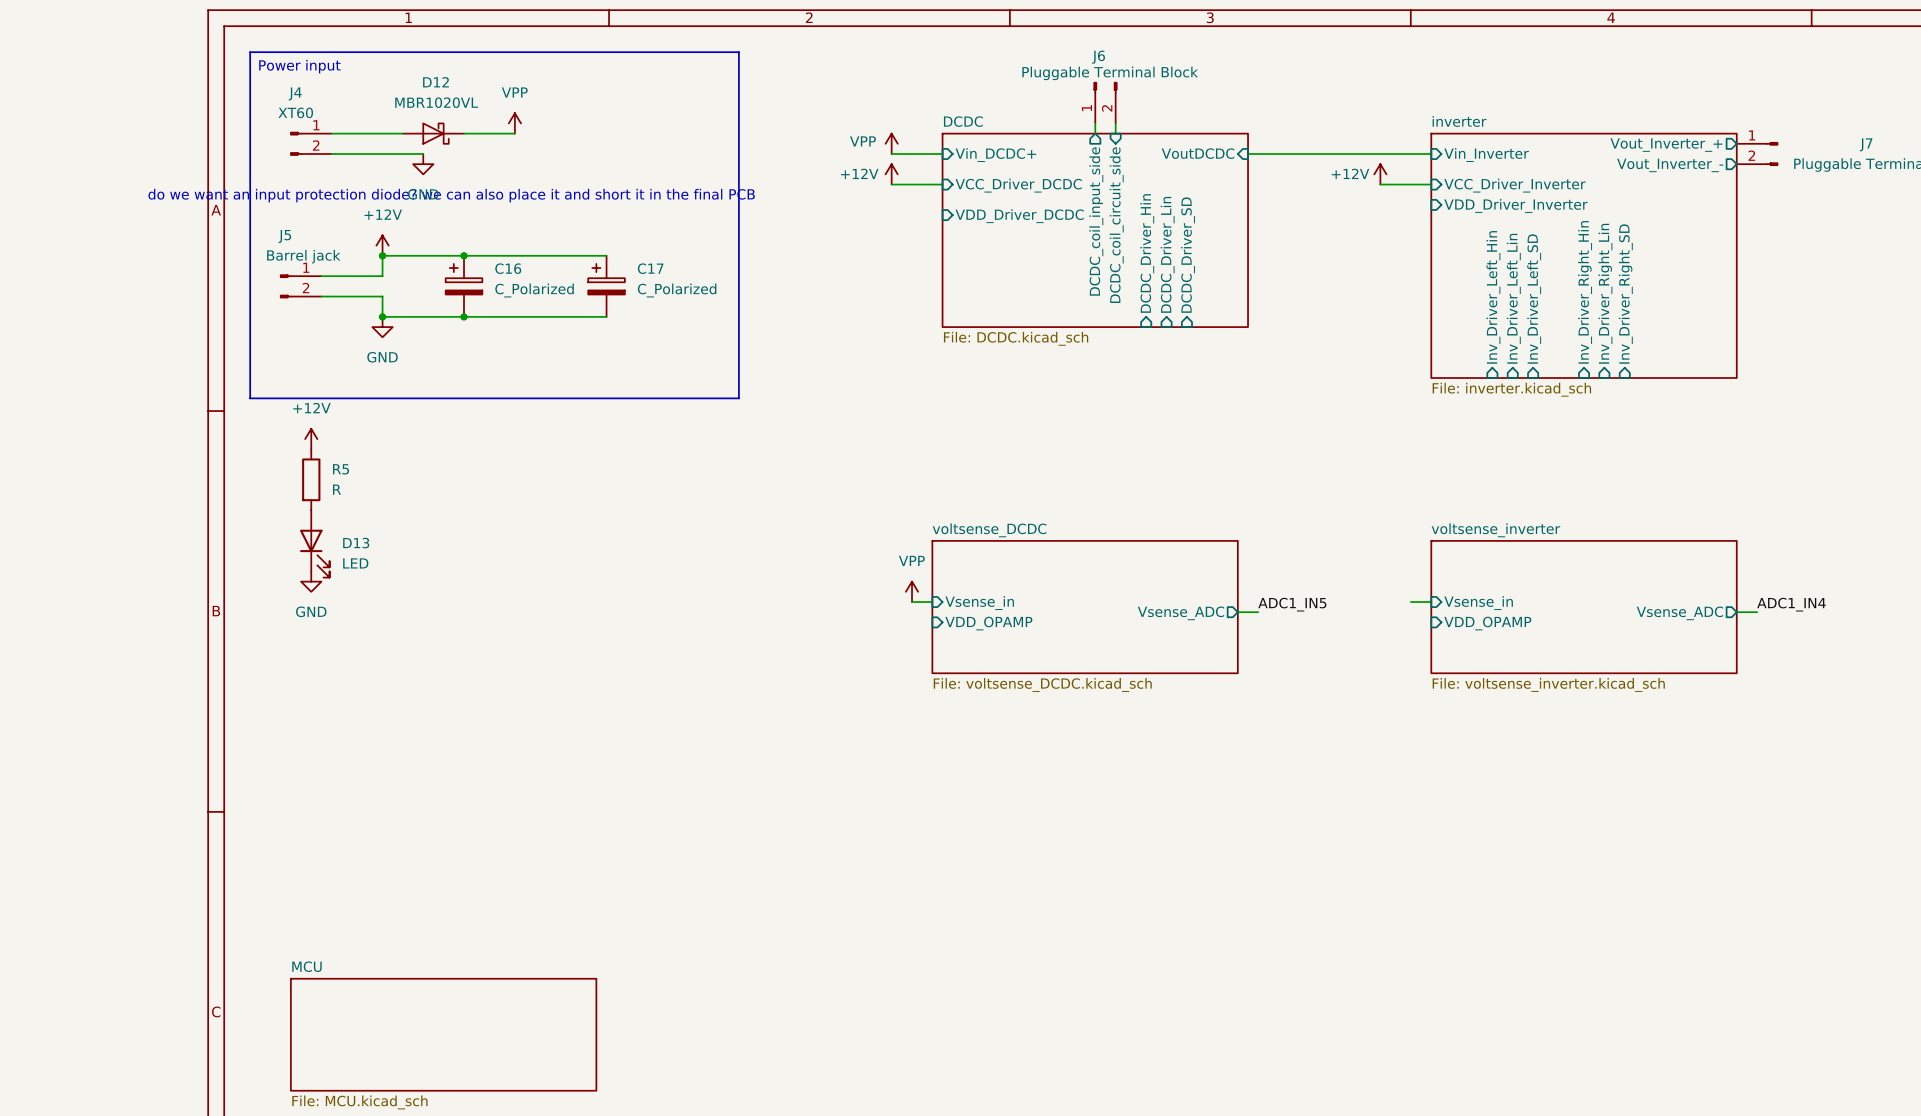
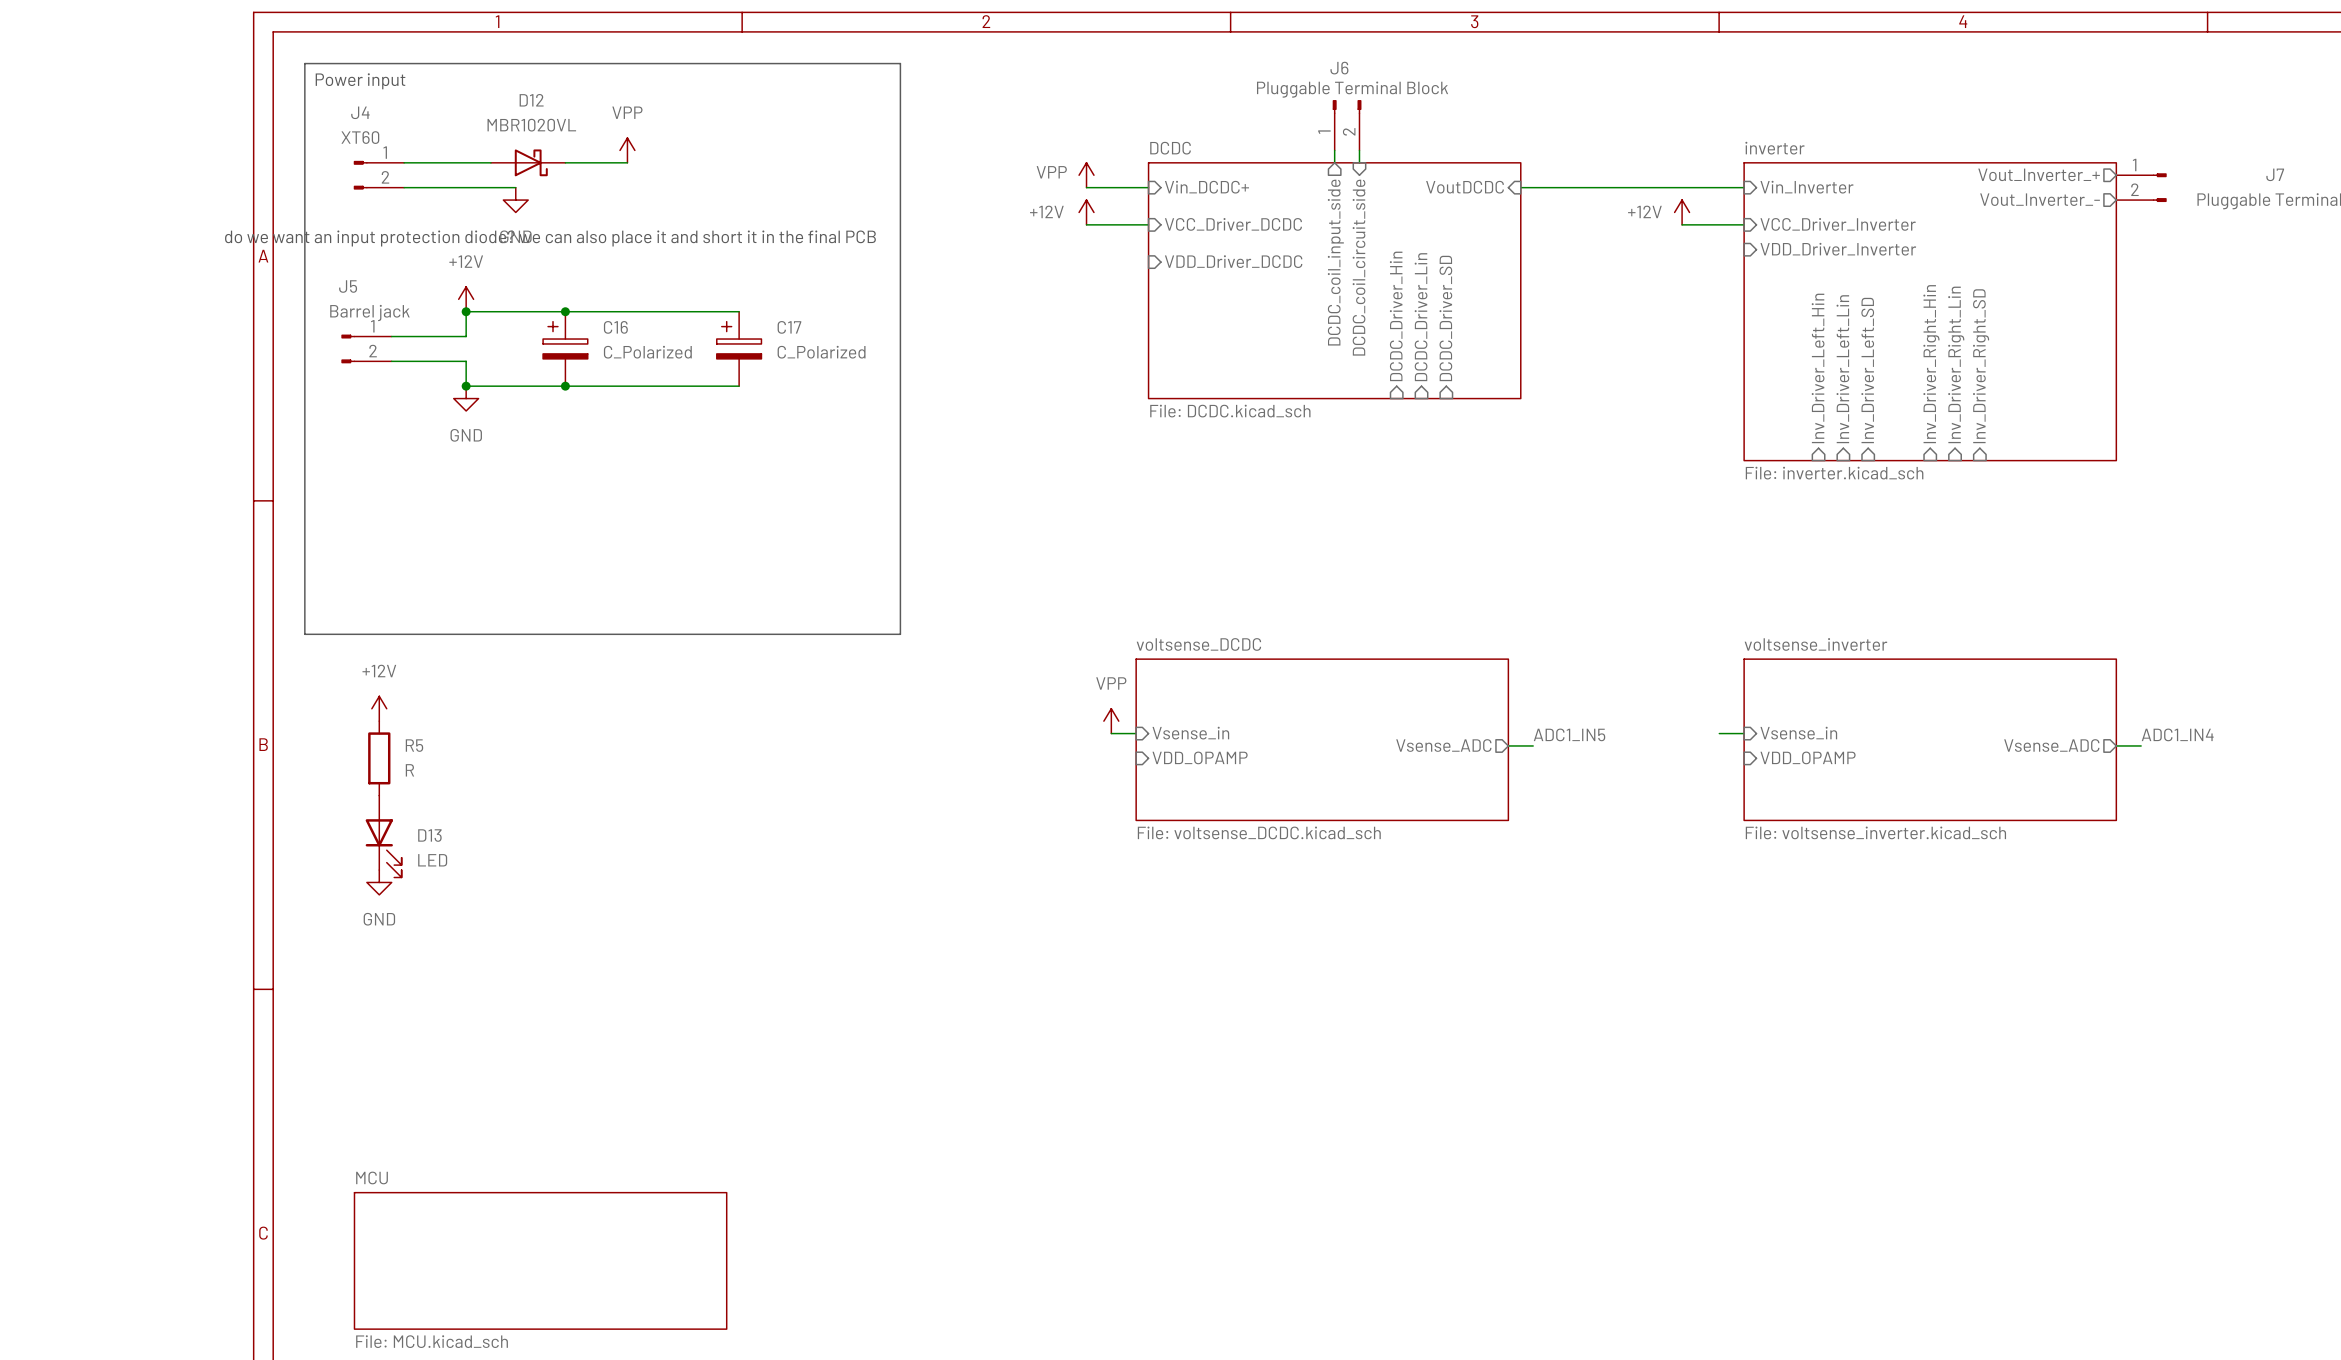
line: (250, 398) (738, 398) -> (304, 485) (304, 634) (900, 634) (900, 485)
power symbol: +12V (311, 439) -> none
R5 position: (311, 479) -> (379, 758)
D13 position: (314, 543) -> (383, 836)
power symbol: GND (311, 581) -> +12V (379, 708)
power symbol: none -> GND (379, 882)

